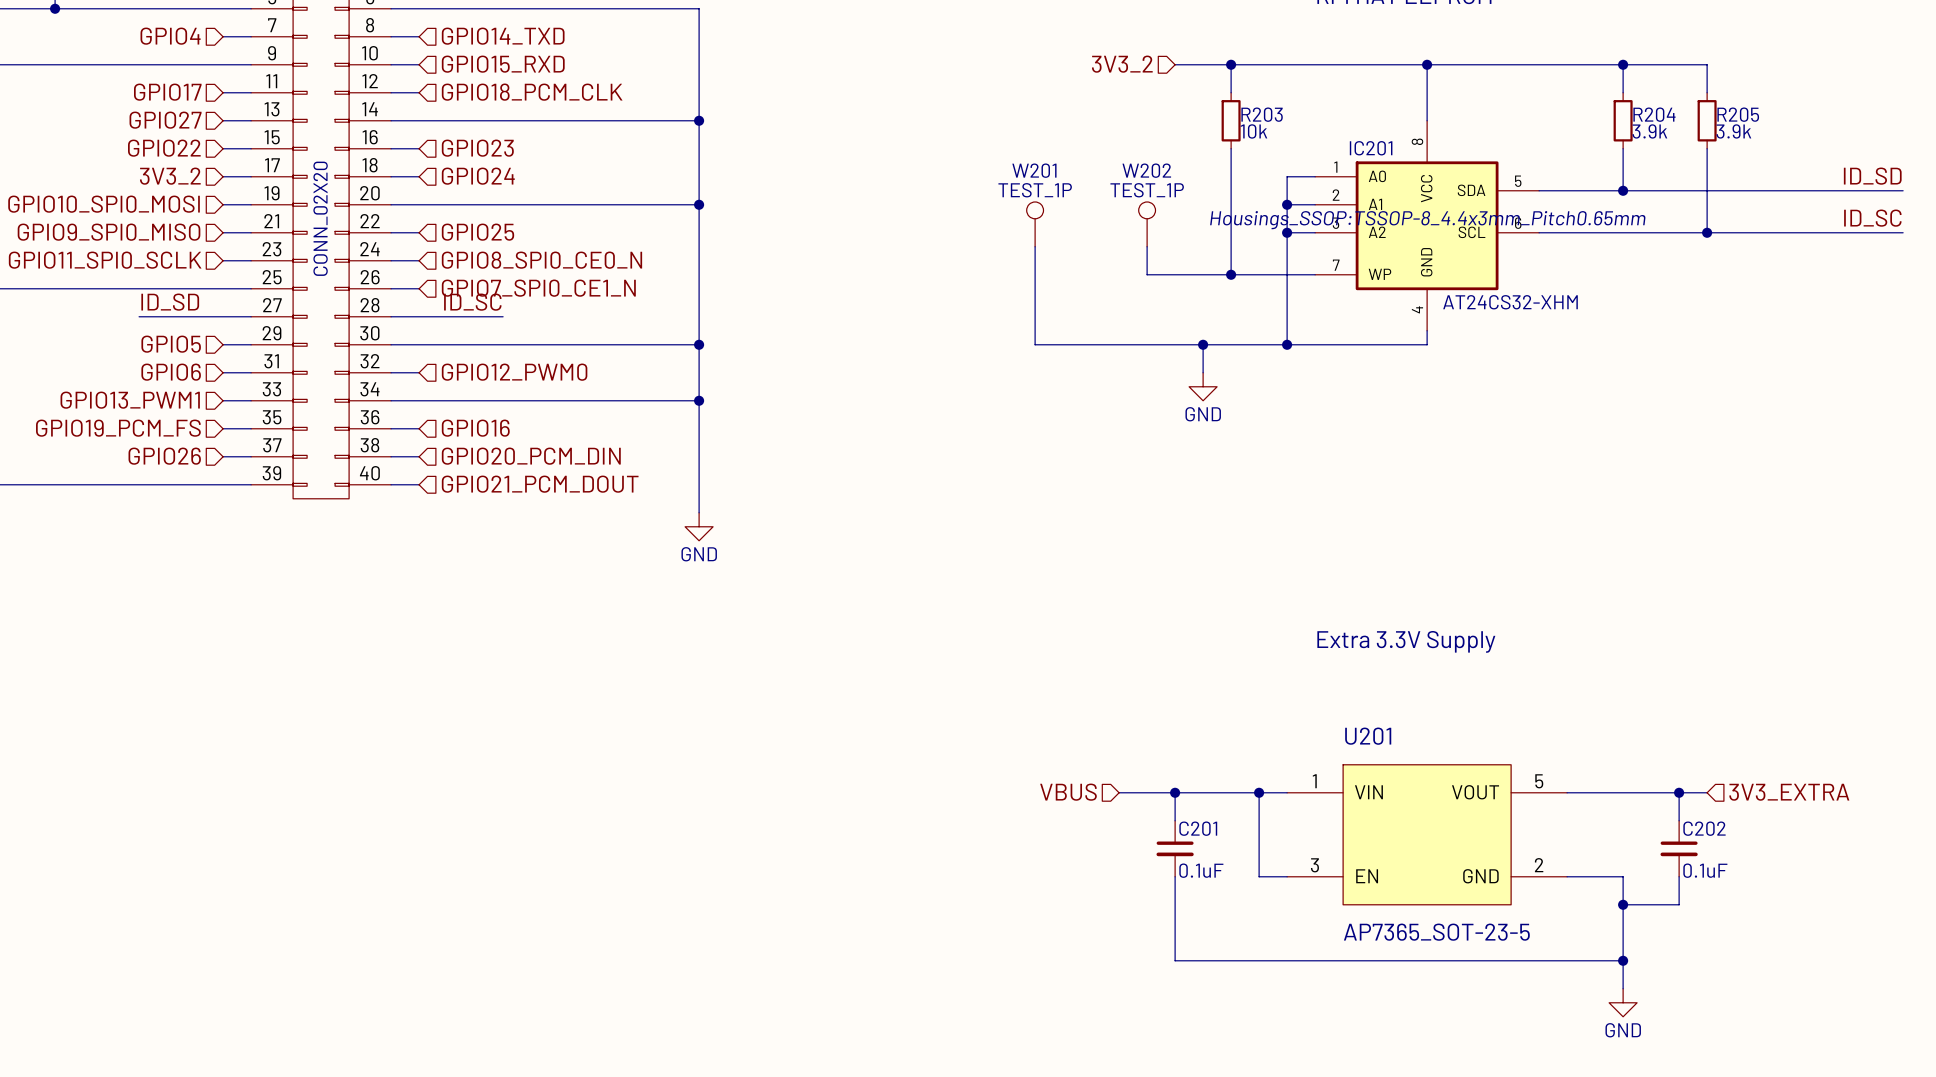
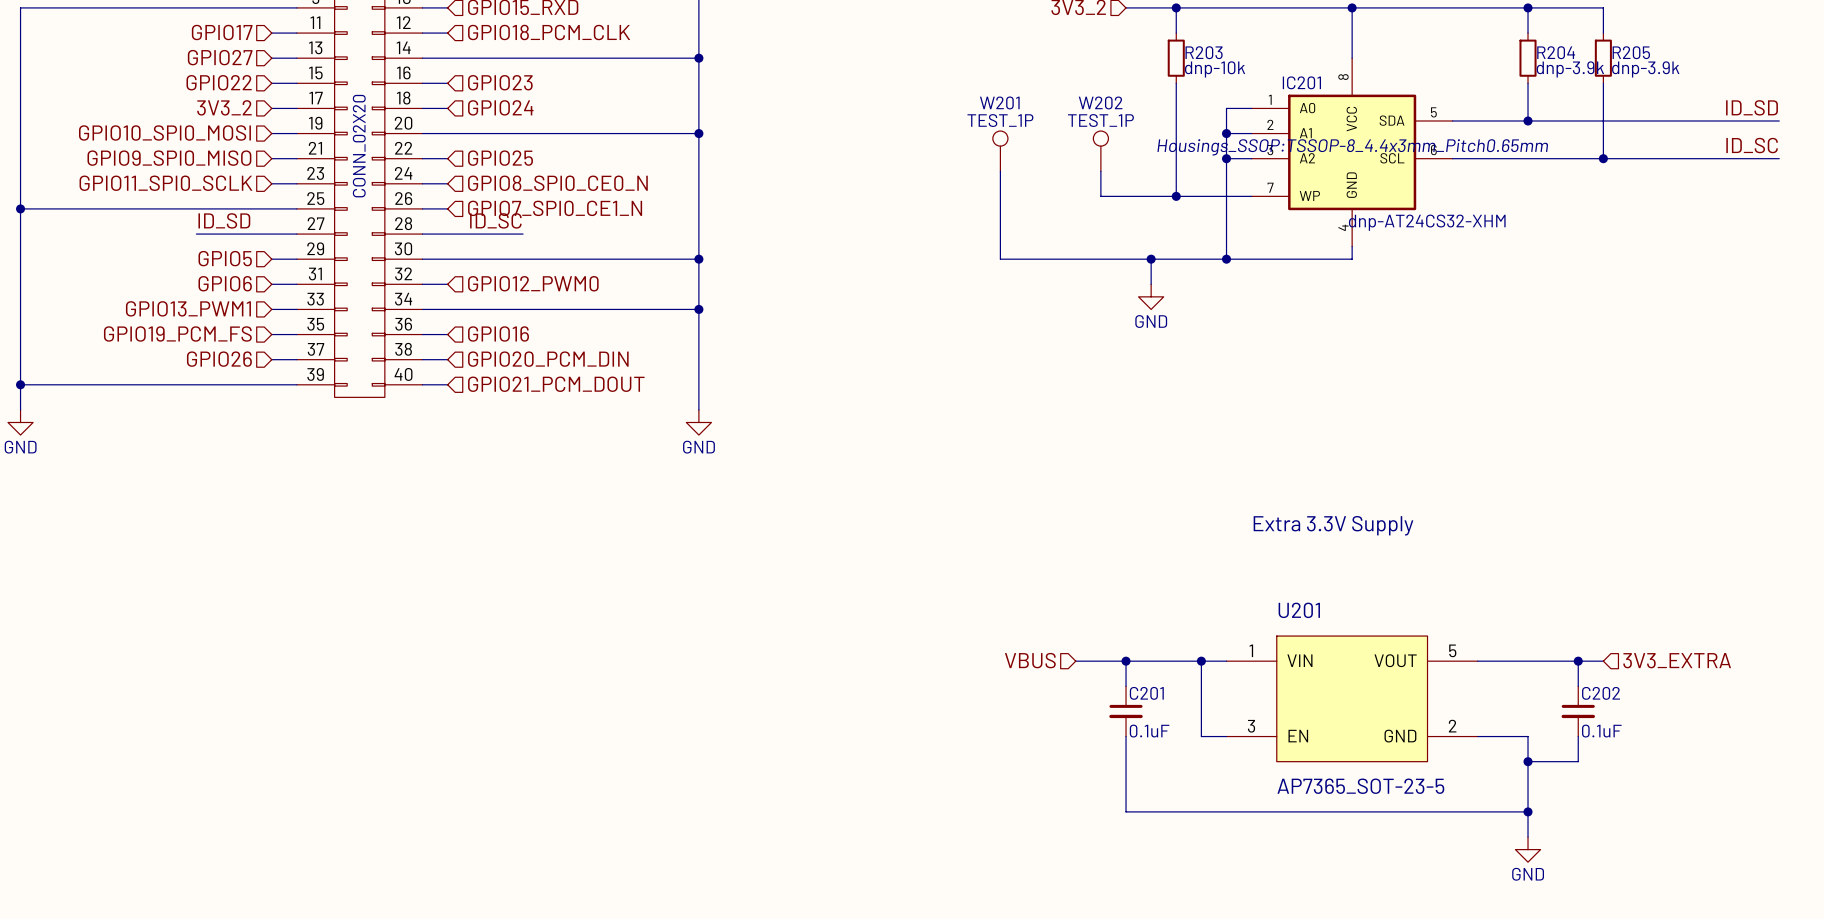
R203 value: 10k (1253, 131) -> dnp-10k (1215, 69)
R204 value: 3.9k (1649, 131) -> dnp-3.9k (1570, 69)
R205 value: 3.9k (1733, 131) -> dnp-3.9k (1645, 69)
IC201 value: AT24CS32-XHM (1510, 302) -> dnp-AT24CS32-XHM (1427, 222)

